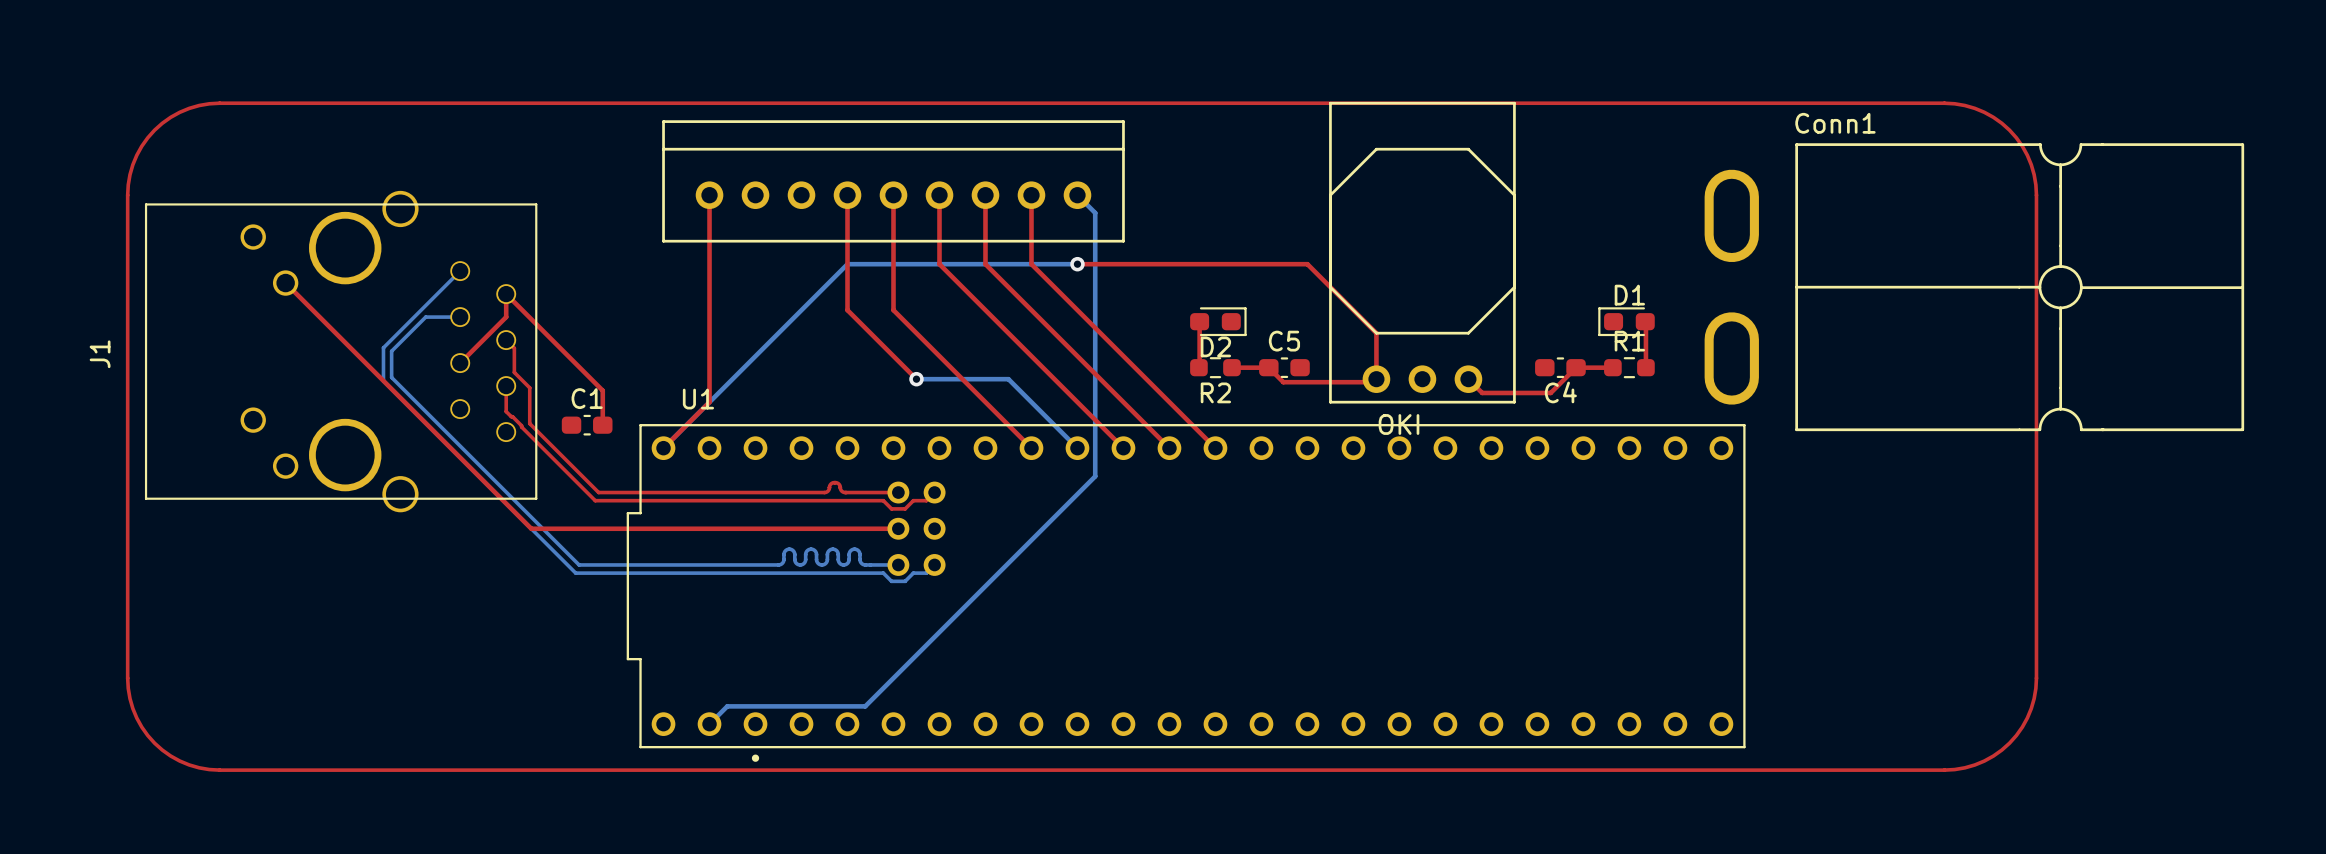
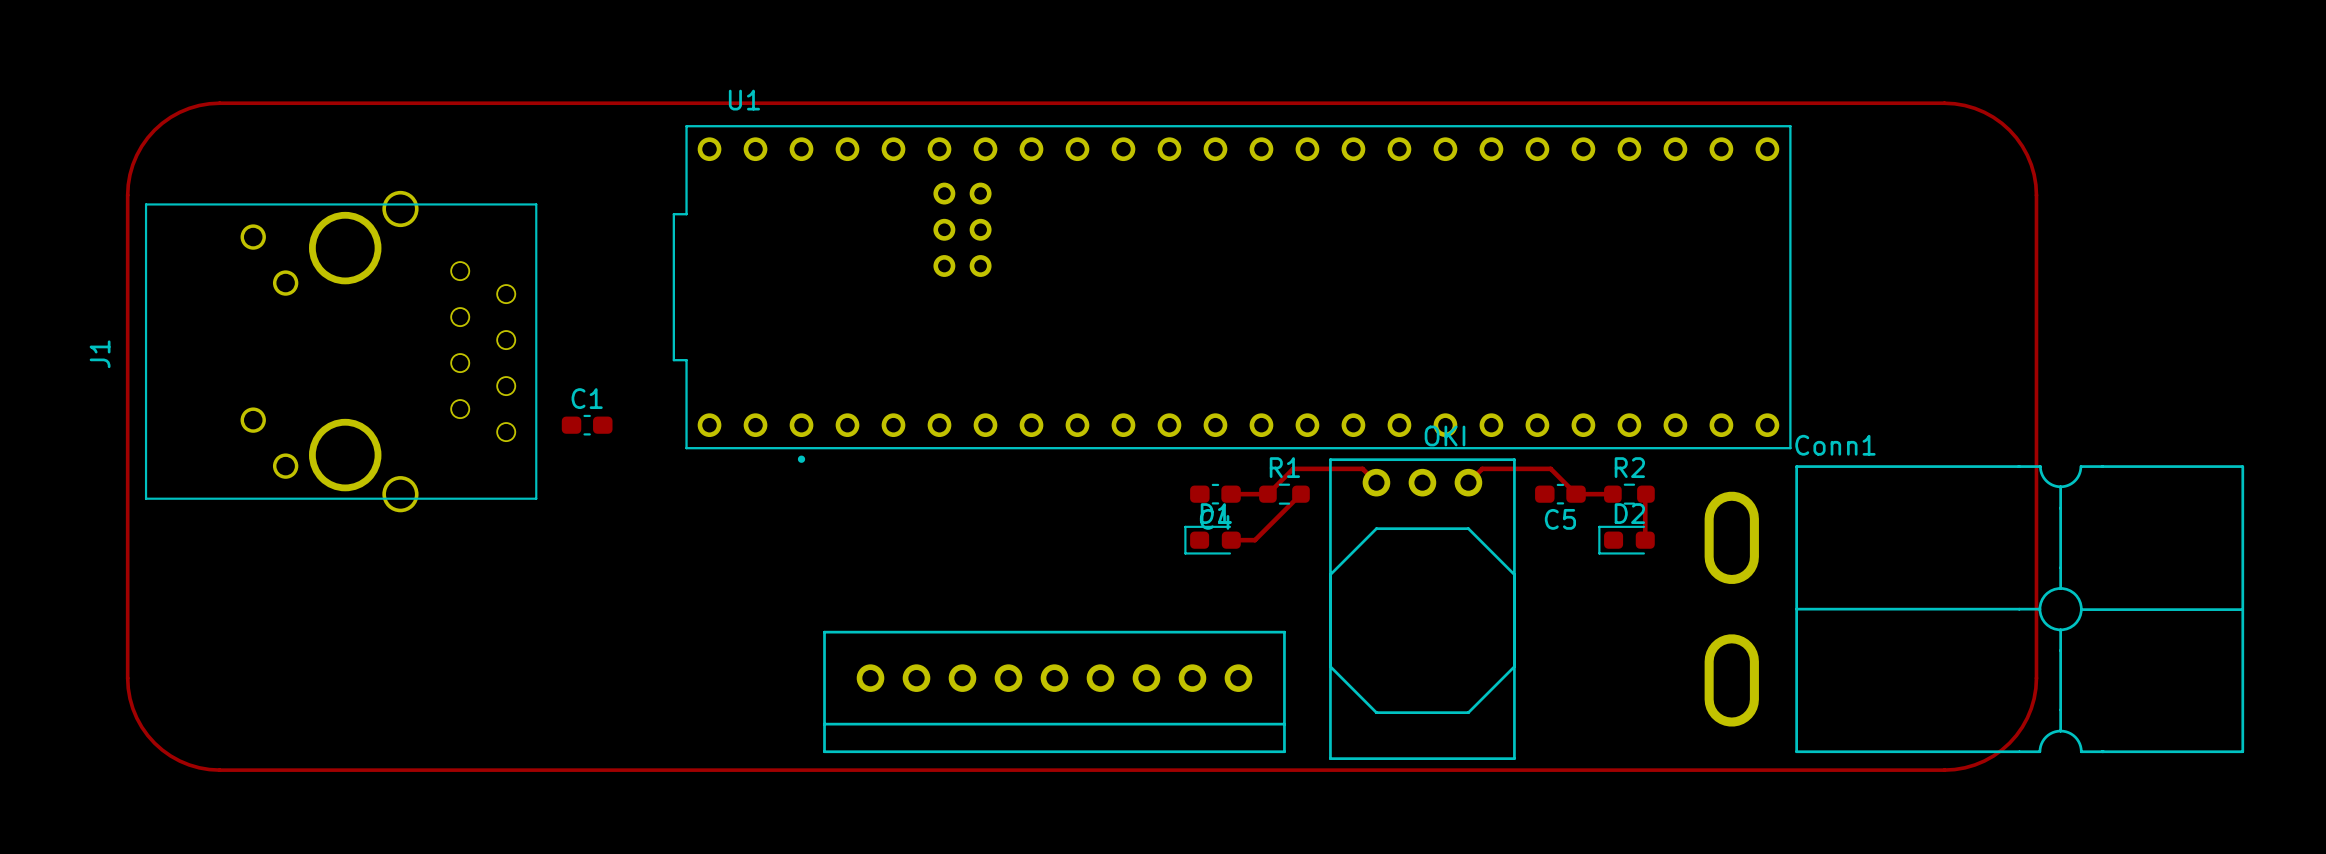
part: (893, 181) -> none
top track: (709, 195) (709, 402) (663, 448) -> none
top track: (847, 195) (847, 310) (916, 379) -> none
top track: (893, 195) (893, 310) (1031, 448) -> none
top track: (939, 195) (939, 264) (1123, 448) -> none
top track: (985, 195) (985, 264) (1169, 448) -> none
top track: (1031, 195) (1031, 264) (1215, 448) -> none
bottom track: (1077, 195) (1095, 212) (1095, 476) (865, 706) (727, 706) (709, 724) -> none
part rotation: 0° (1422, 252) -> 180° (1422, 609)
part position: (1422, 252) -> (1422, 609)
top track: (1077, 264) (1307, 264) (1376, 333) (1376, 379) (1373, 382) (1283, 382) (1268, 367) (1231, 367) -> none
bottom track: (1077, 264) (847, 264) (663, 448) -> none
via: (1077, 264) -> none
bottom track: (460, 271) (383, 347) (383, 380) (575, 573) (883, 573) (891, 581) (905, 581) (913, 573) (926, 573) (934, 564) -> none
top track: (285, 283) (531, 528) (898, 528) -> none
Conn1 position: (1974, 287) -> (1974, 609)
bottom track: (460, 317) (425, 317) (391, 351) (391, 377) (579, 564) (779, 564) (783, 561) (784, 551) (789, 549) (794, 552) (795, 562) (800, 564) (805, 561) (806, 551) (811, 549) (815, 551) (816, 561) (821, 564) (826, 561) (828, 551) (832, 549) (837, 551) (838, 561) (842, 564) (848, 562) (849, 552) (854, 549) (859, 551) (860, 560) (863, 564) (898, 564) -> none
top track: (1199, 321) (1198, 367) -> none
D2 rotation: 0° (1218, 321) -> 180° (1626, 540)
D2 position: (1218, 321) -> (1626, 540)
D1 position: (1626, 321) -> (1212, 540)
top track: (1645, 321) (1645, 367) -> none
top track: (506, 340) (514, 348) (514, 372) (529, 387) (529, 423) (598, 492) (824, 492) (834, 482) (838, 484) (841, 490) (844, 492) (898, 492) -> none
C5 name position: C5 (1284, 341) -> C5 (1560, 519)
top track: (460, 363) (506, 317) (506, 294) (602, 390) (602, 425) -> none
R2 position: (1215, 367) -> (1629, 494)
C5 position: (1284, 367) -> (1560, 494)
C4 position: (1560, 367) -> (1215, 494)
top track: (1612, 367) (1576, 367) (1550, 392) (1482, 392) (1468, 379) -> none
R1 position: (1629, 367) -> (1284, 494)
bottom track: (916, 379) (1008, 379) (1077, 448) -> none
via: (916, 379) -> none
top track: (506, 386) (506, 411) (595, 500) (883, 500) (891, 508) (905, 508) (913, 500) (926, 500) (934, 492) -> none
R2 name position: R2 (1215, 392) -> R2 (1629, 467)
top track: none -> (1376, 482) (1362, 468) (1293, 468) (1267, 494) (1231, 494)
top track: none -> (1468, 482) (1482, 468) (1550, 468) (1576, 494) (1612, 494)
top track: none -> (1300, 494) (1254, 540) (1231, 540)
top track: none -> (1645, 494) (1645, 540)
U1 position: (1186, 592) -> (1232, 293)
part: none -> (1054, 691)

